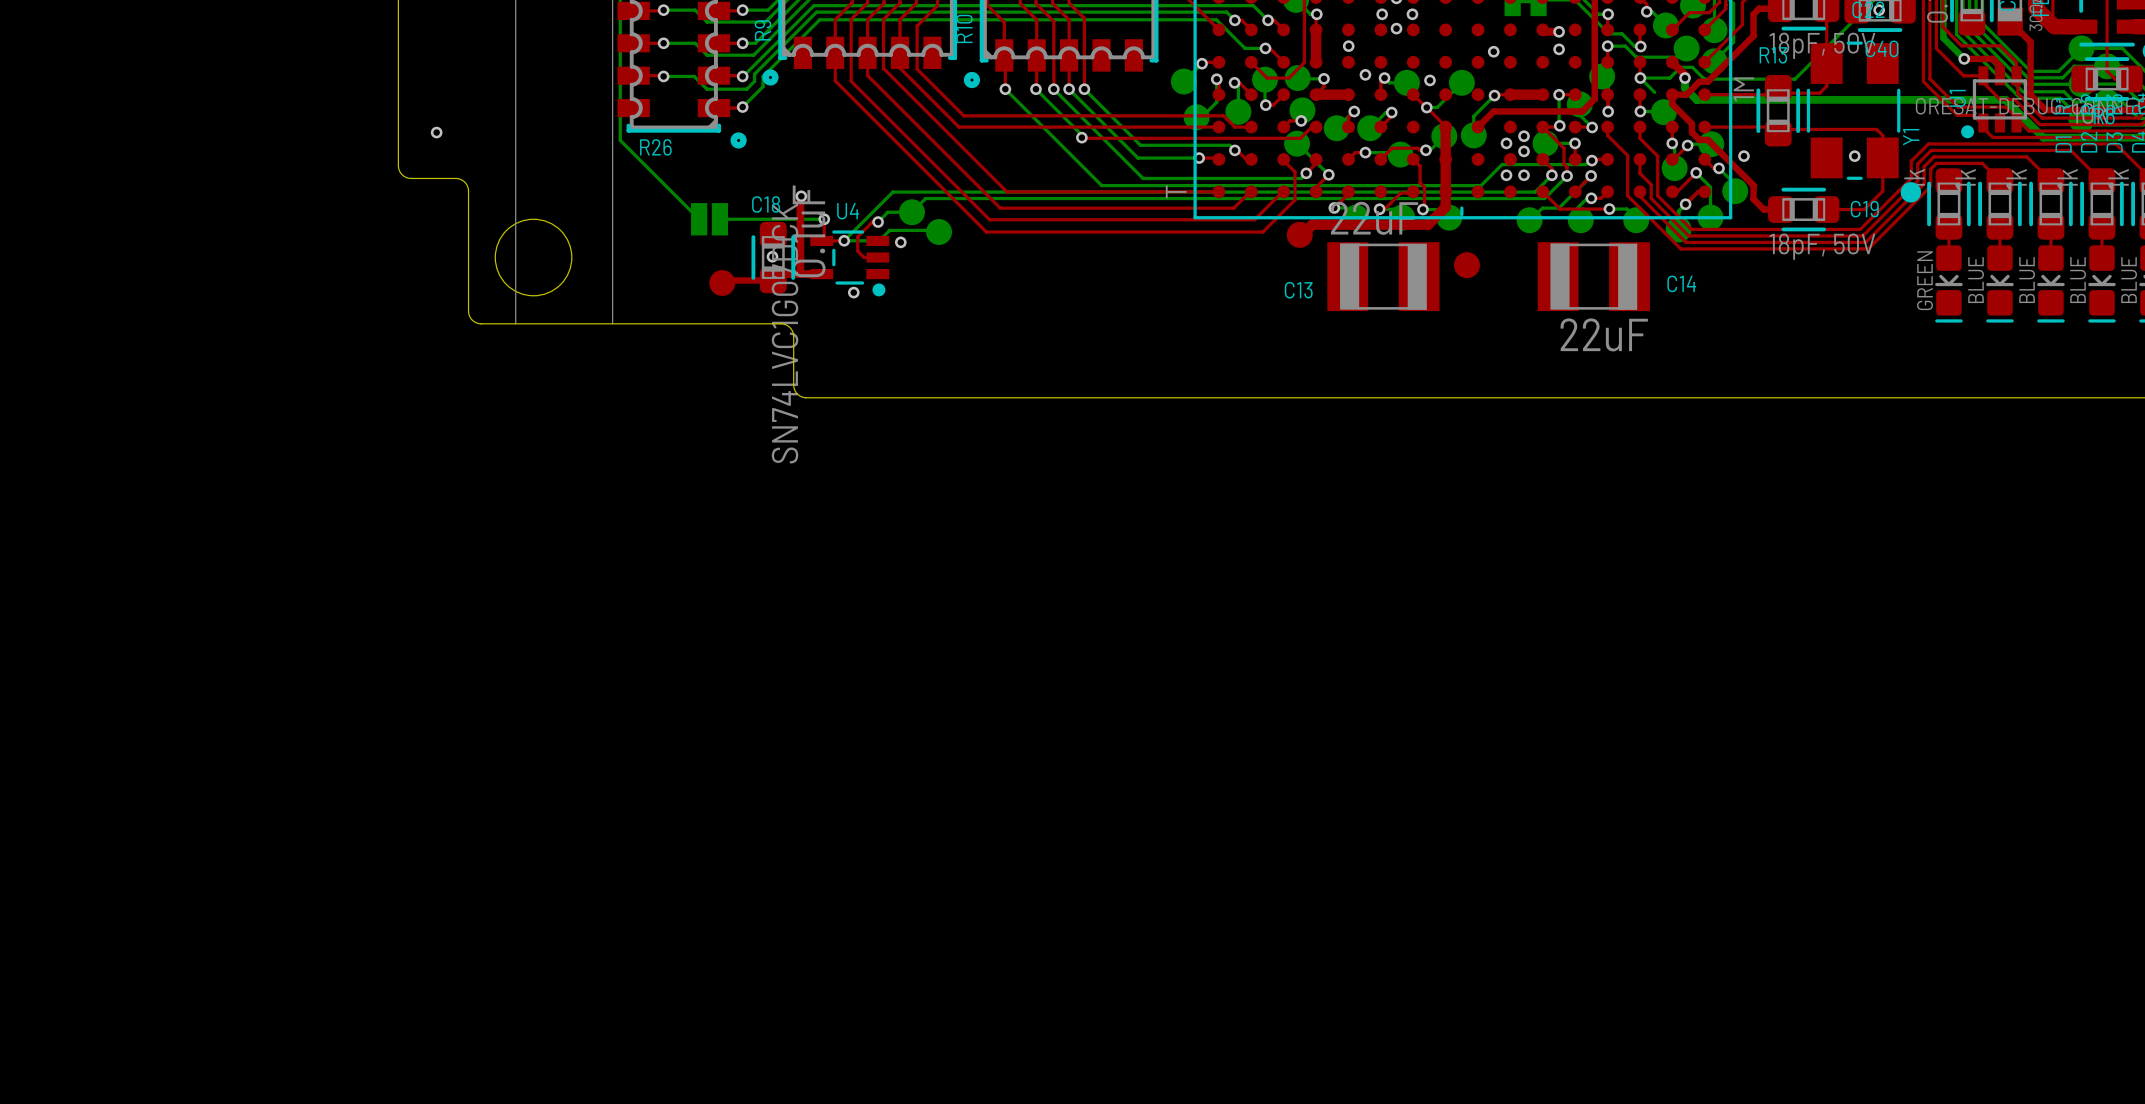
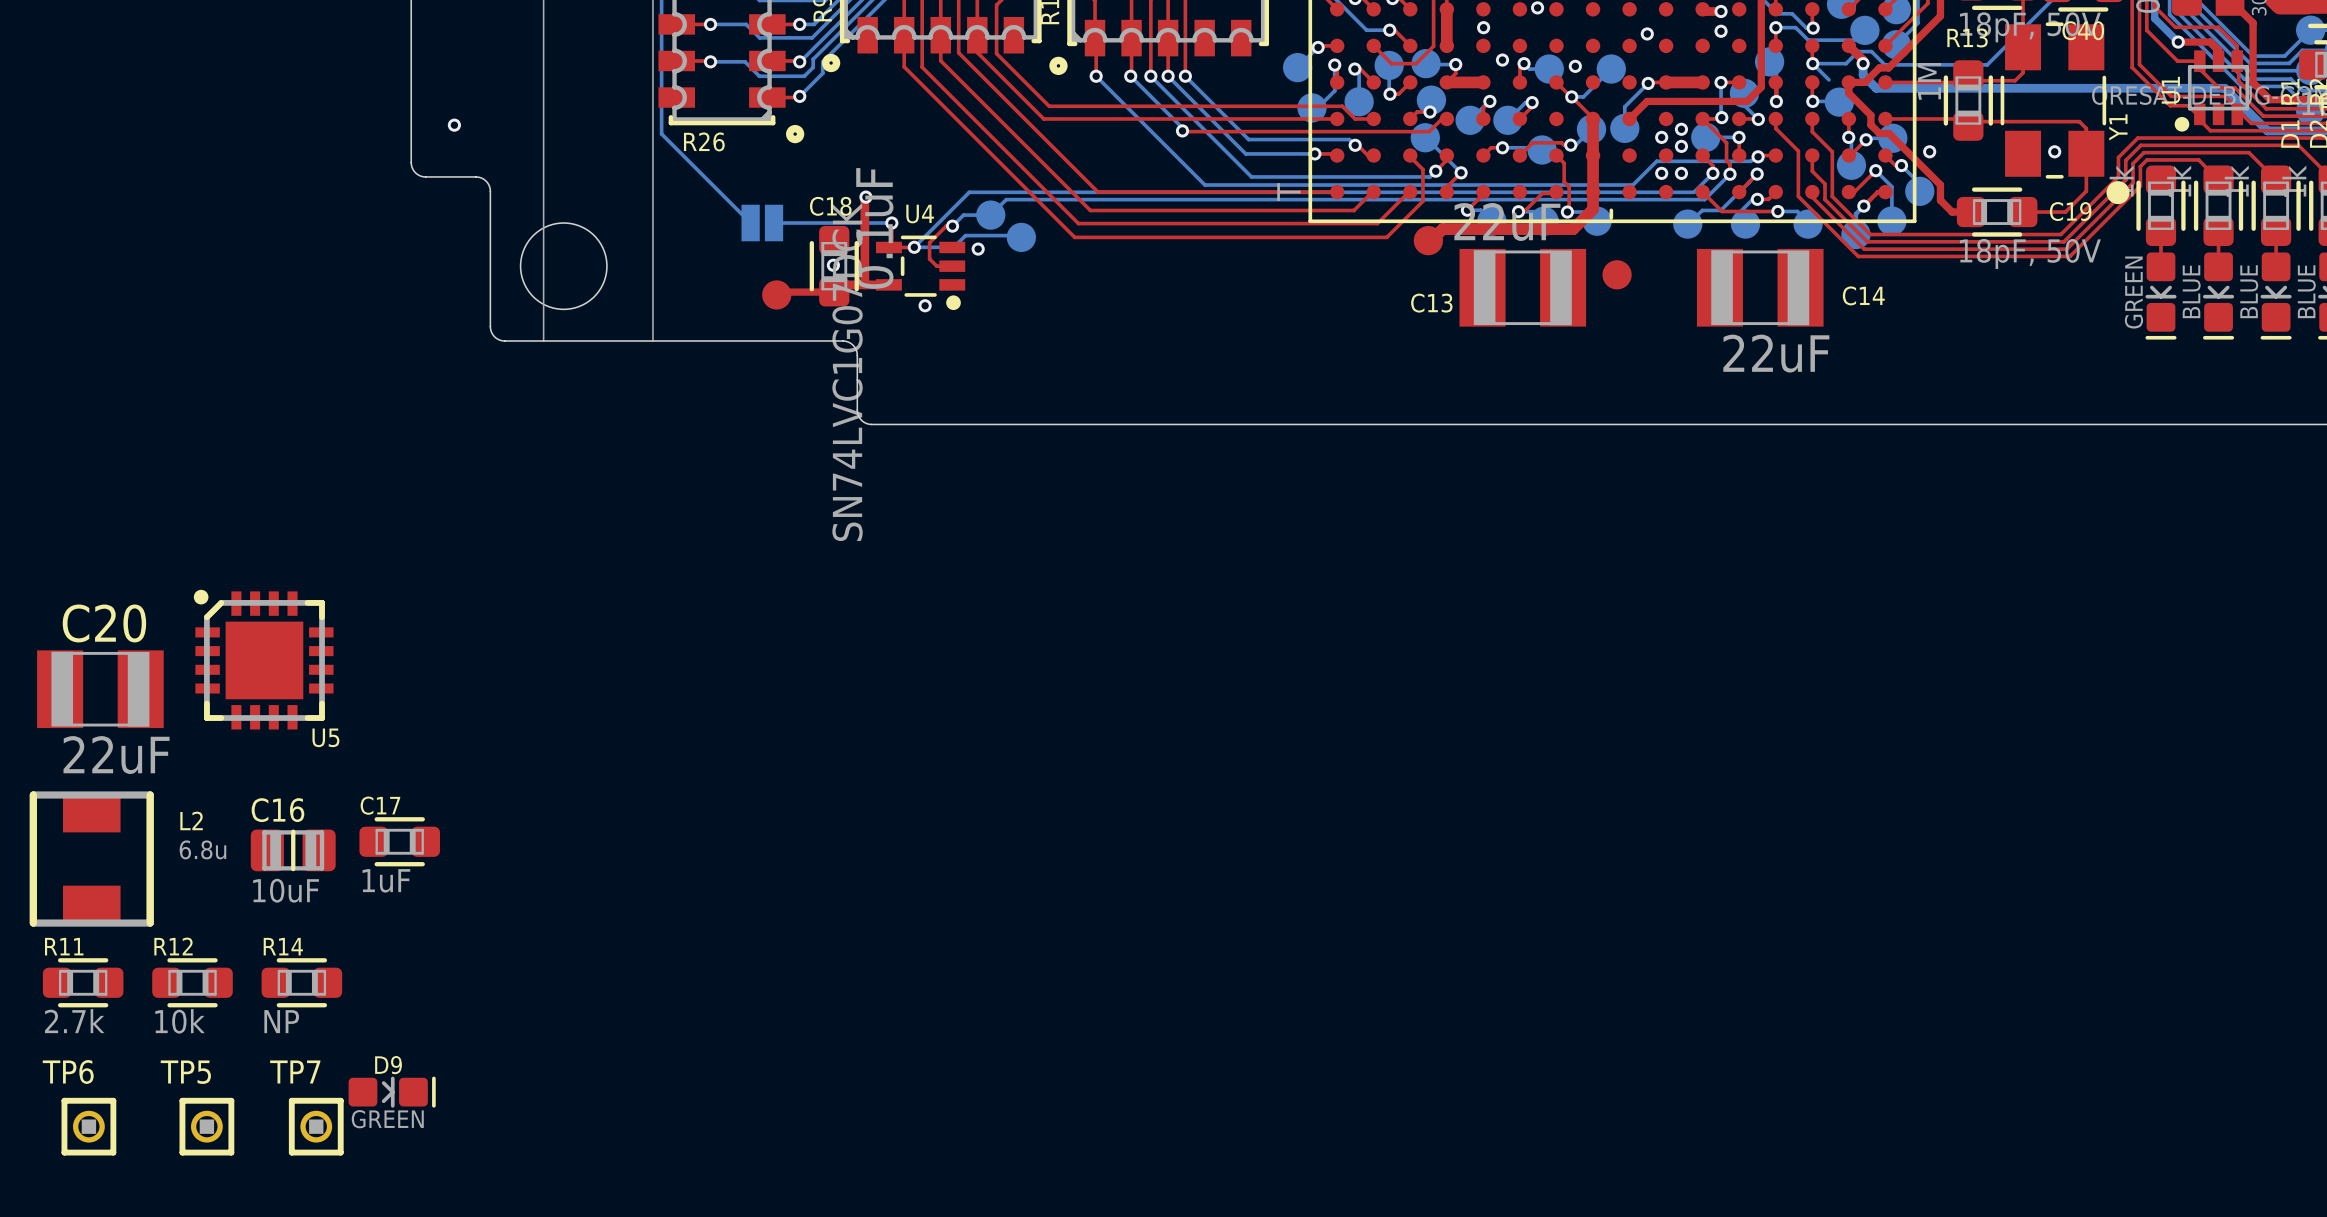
U5: none -> (263, 659)
C20: none -> 22uF (100, 689)
C17: none -> 1uF (399, 841)
C16: none -> 10uF (293, 850)
L2: none -> 6.8u (91, 859)
R11: none -> 2.7k (83, 982)
R12: none -> 10k (192, 982)
R14: none -> NP (301, 982)
D9: none -> GREEN (392, 1092)
TP6: none -> (88, 1126)
TP5: none -> (206, 1126)
TP7: none -> (316, 1126)

